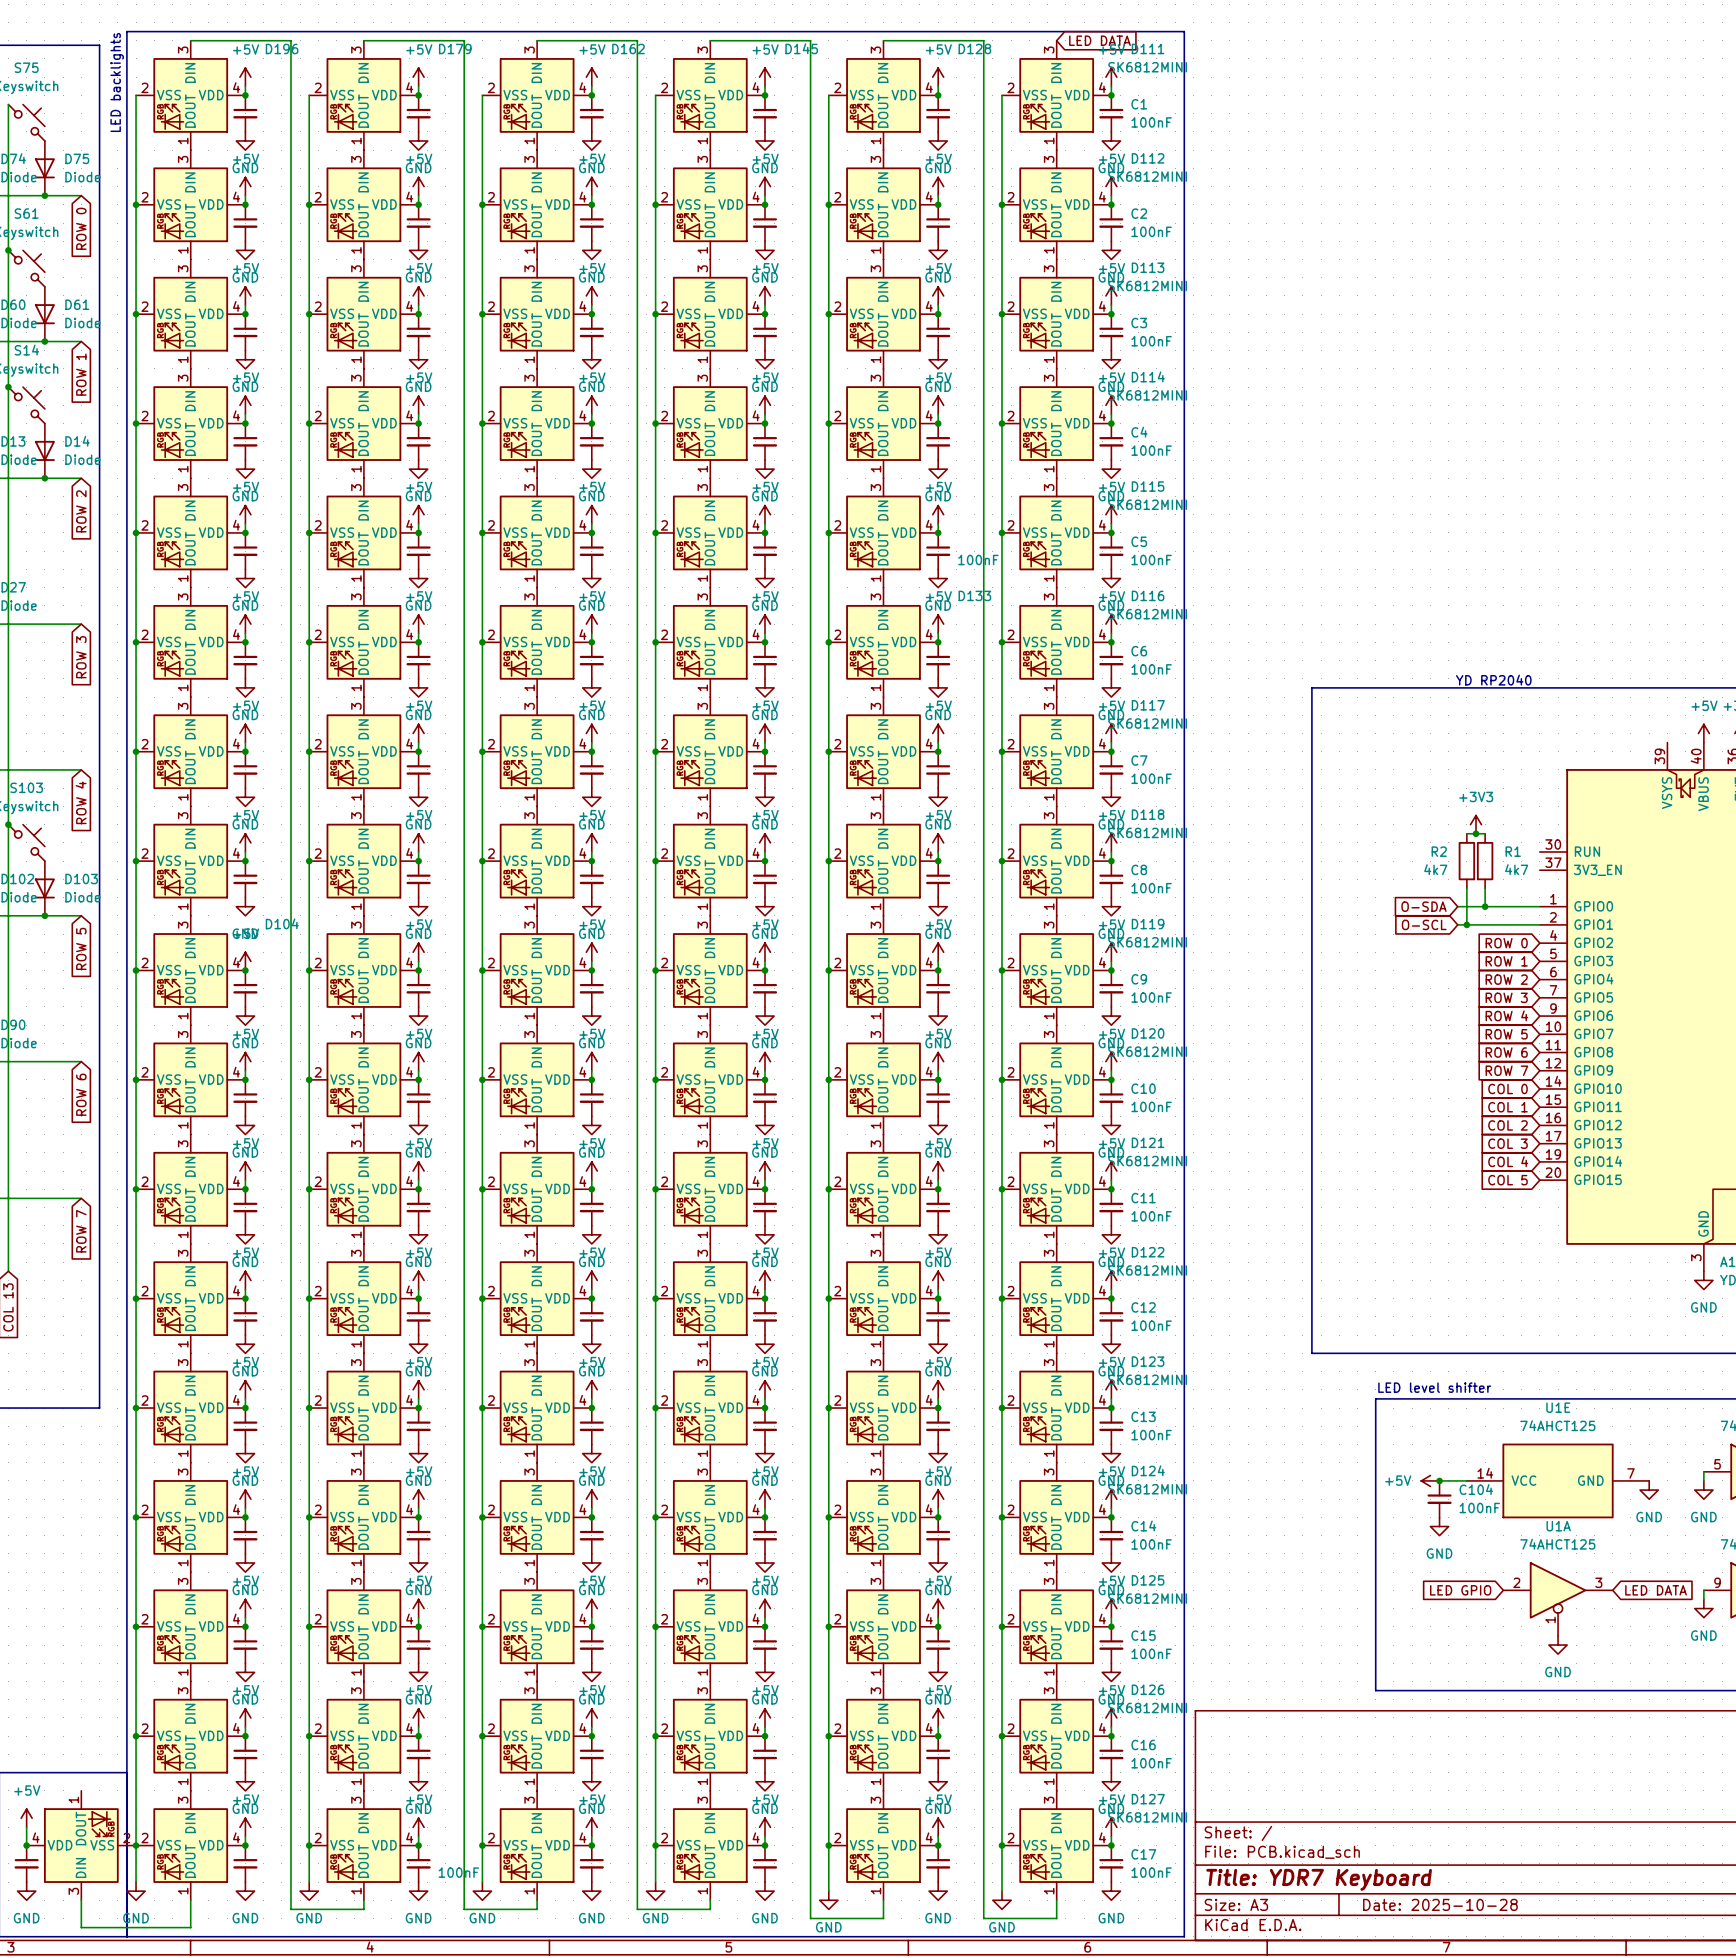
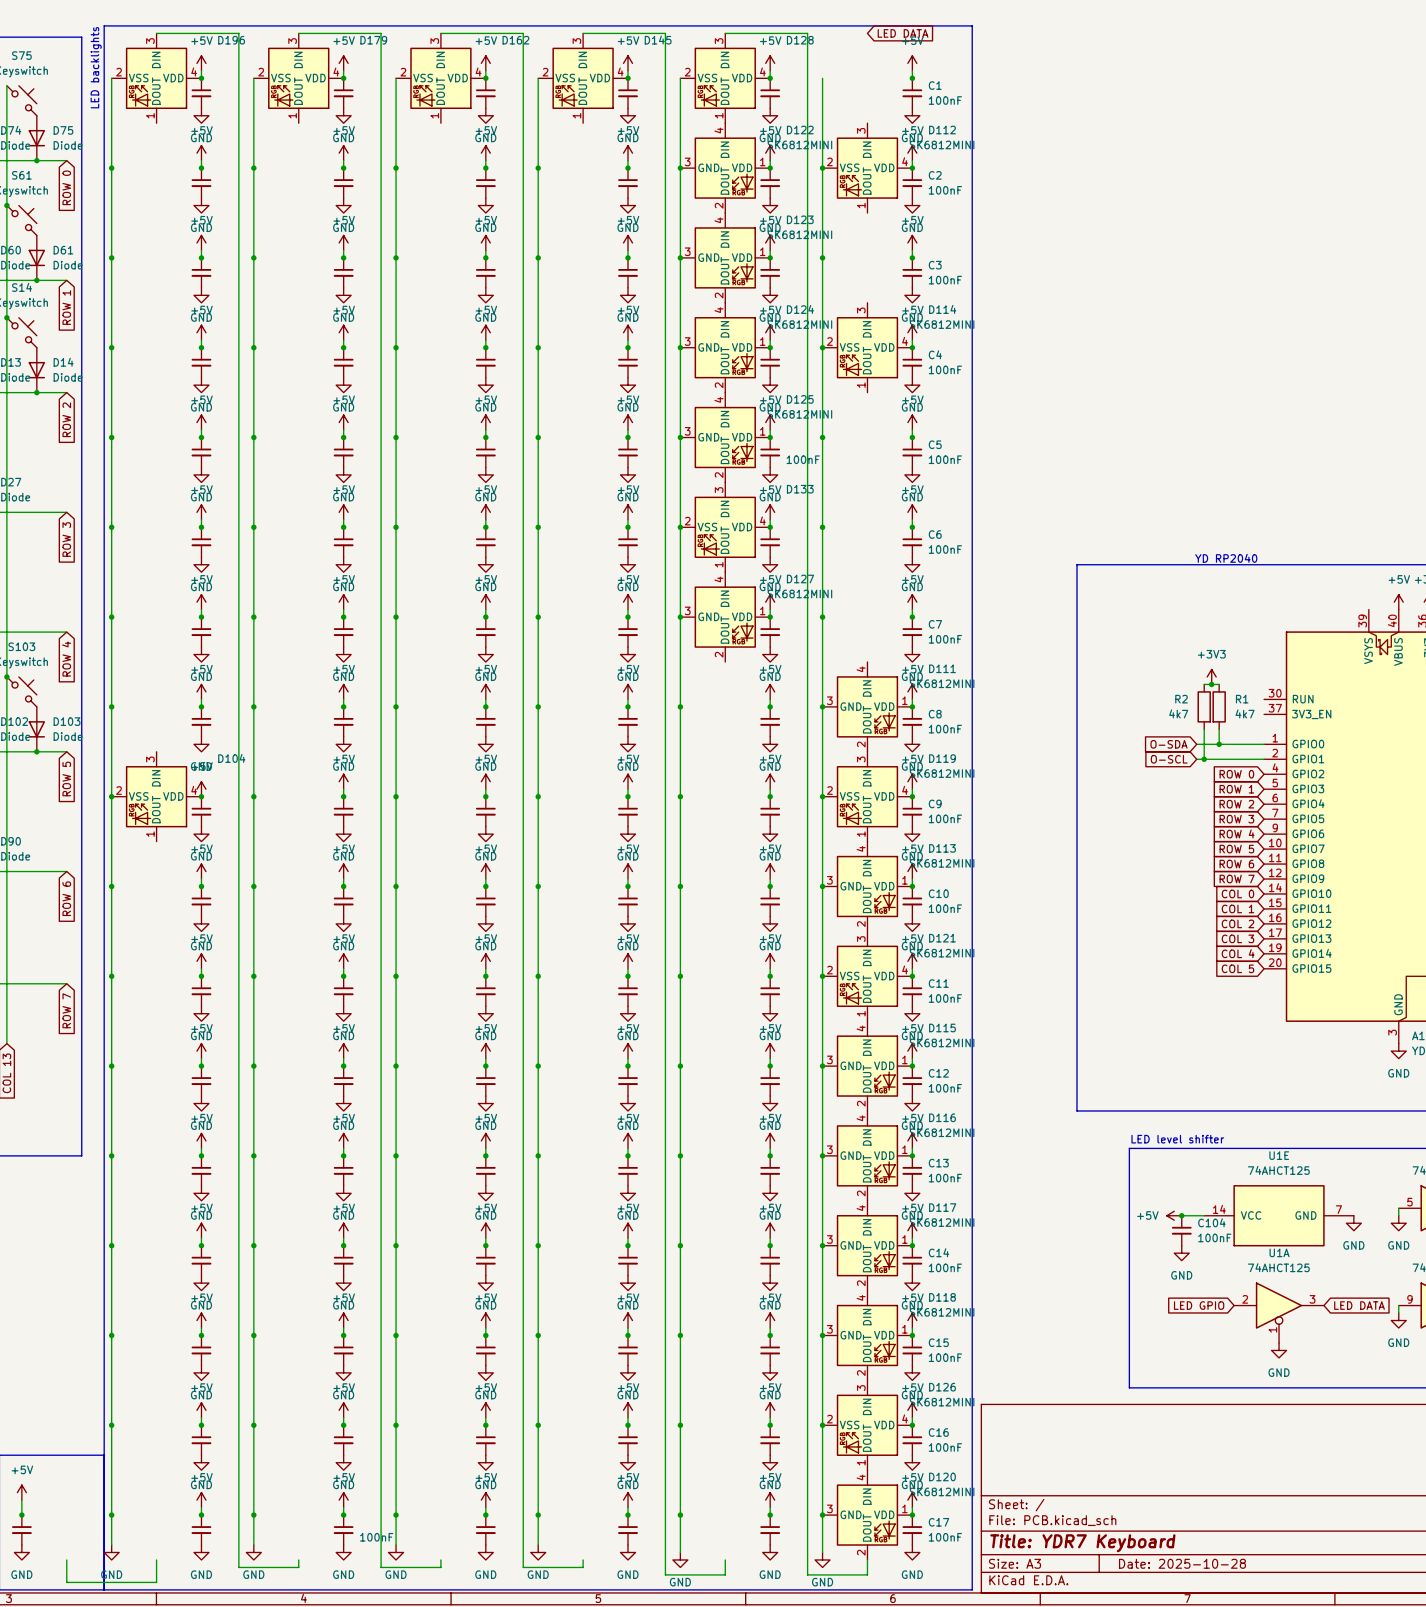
D111 symbol: [1001, 40, 1112, 151] -> [822, 662, 913, 752]
part: (190, 204) -> none
part: (363, 204) -> none
part: (537, 204) -> none
part: (710, 204) -> none
part: (883, 204) -> none
D113 symbol: [1001, 259, 1112, 369] -> [822, 841, 913, 932]
part: (190, 314) -> none
part: (363, 314) -> none
part: (537, 314) -> none
part: (710, 314) -> none
part: (883, 314) -> none
part: (190, 423) -> none
part: (363, 423) -> none
part: (537, 423) -> none
part: (710, 423) -> none
part: (883, 423) -> none
D115 symbol: [1001, 478, 1112, 588] -> [822, 1021, 913, 1111]
part: (190, 532) -> none
part: (363, 532) -> none
part: (537, 532) -> none
part: (710, 532) -> none
part: (883, 532) -> none
D116 symbol: [1001, 587, 1112, 698] -> [822, 1110, 913, 1201]
part: (190, 642) -> none
part: (363, 642) -> none
part: (537, 642) -> none
part: (710, 642) -> none
D117 symbol: [1001, 697, 1112, 807] -> [822, 1200, 913, 1291]
part: (190, 751) -> none
part: (363, 751) -> none
part: (537, 751) -> none
part: (710, 751) -> none
part: (883, 751) -> none
D118 symbol: [1001, 806, 1112, 916] -> [822, 1290, 913, 1381]
part: (190, 861) -> none
part: (363, 861) -> none
part: (537, 861) -> none
part: (710, 861) -> none
part: (883, 861) -> none
part: (363, 970) -> none
part: (537, 970) -> none
part: (710, 970) -> none
part: (883, 970) -> none
D120 symbol: [1001, 1025, 1112, 1135] -> [822, 1470, 913, 1560]
part: (190, 1079) -> none
part: (363, 1079) -> none
part: (537, 1079) -> none
part: (710, 1079) -> none
part: (883, 1079) -> none
part: (190, 1189) -> none
part: (363, 1189) -> none
part: (537, 1189) -> none
part: (710, 1189) -> none
part: (883, 1189) -> none
D122 symbol: [1001, 1243, 1112, 1354] -> [680, 123, 771, 214]
part: (190, 1298) -> none
part: (363, 1298) -> none
part: (537, 1298) -> none
part: (710, 1298) -> none
part: (883, 1298) -> none
D123 symbol: [1001, 1353, 1112, 1463] -> [680, 213, 771, 303]
part: (190, 1408) -> none
part: (363, 1408) -> none
part: (537, 1408) -> none
part: (710, 1408) -> none
part: (883, 1408) -> none
D124 symbol: [1001, 1462, 1112, 1573] -> [680, 302, 771, 393]
part: (190, 1517) -> none
part: (363, 1517) -> none
part: (537, 1517) -> none
part: (710, 1517) -> none
part: (883, 1517) -> none
D125 symbol: [1001, 1572, 1112, 1682] -> [680, 392, 771, 483]
part: (190, 1626) -> none
part: (363, 1626) -> none
part: (537, 1626) -> none
part: (710, 1626) -> none
part: (883, 1626) -> none
part: (190, 1736) -> none
part: (363, 1736) -> none
part: (537, 1736) -> none
part: (710, 1736) -> none
part: (883, 1736) -> none
D127 symbol: [1001, 1790, 1112, 1901] -> [680, 572, 771, 663]
part: (81, 1845) -> none
part: (190, 1845) -> none
part: (363, 1845) -> none
part: (537, 1845) -> none
part: (710, 1845) -> none
part: (883, 1845) -> none

